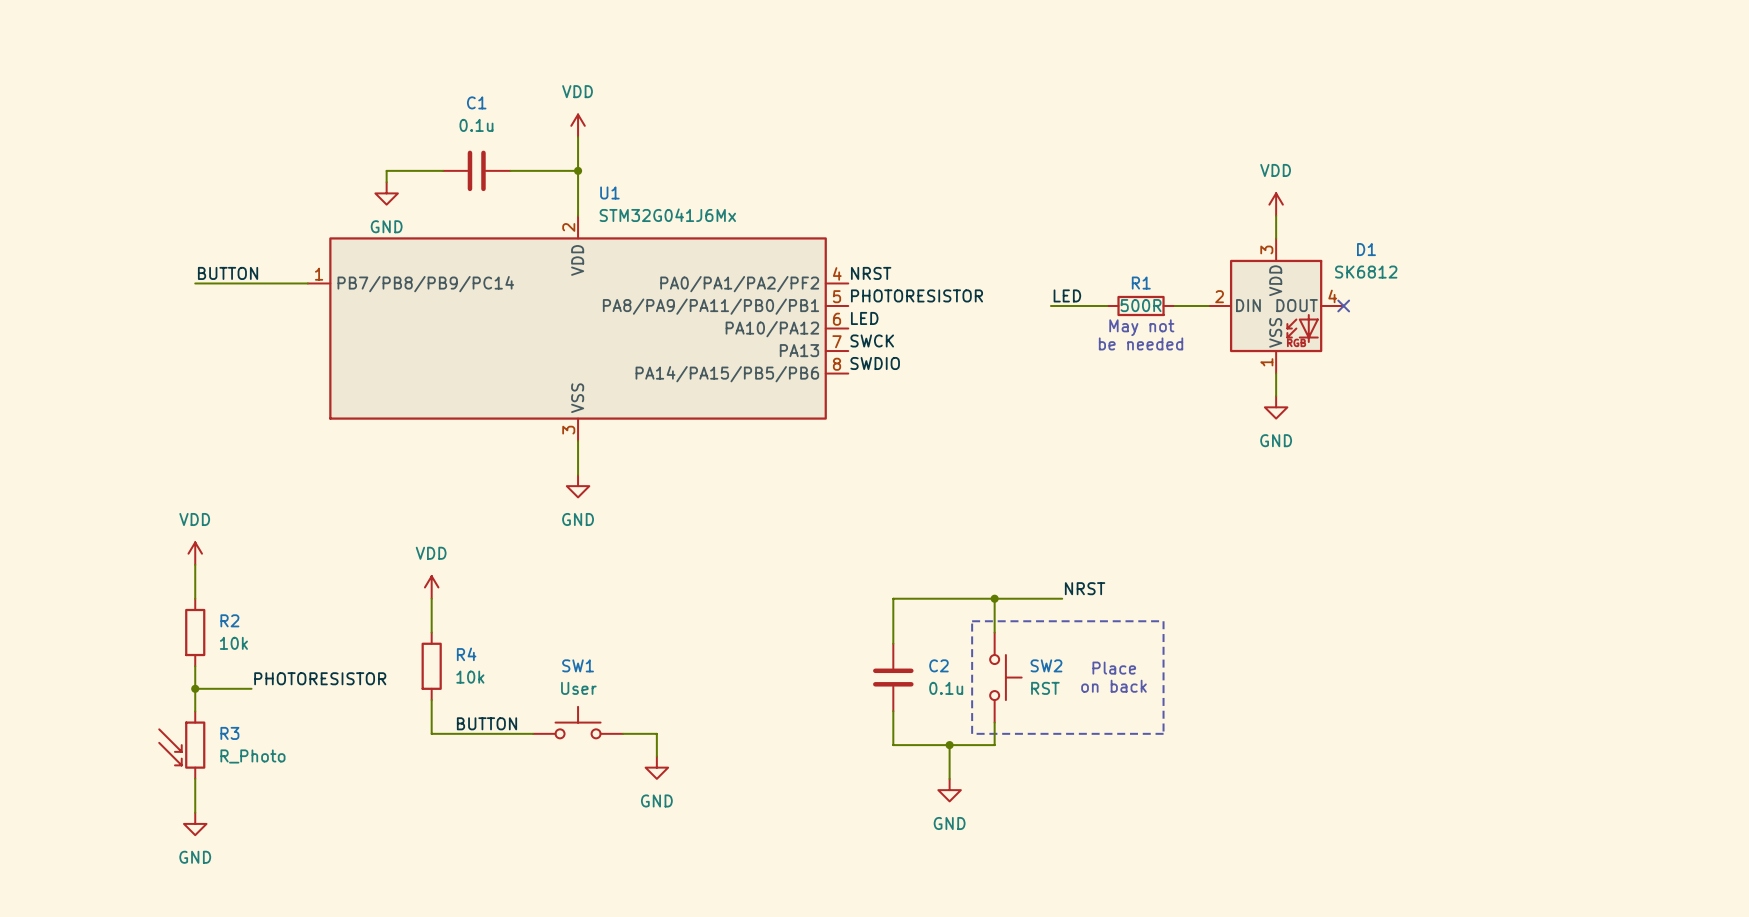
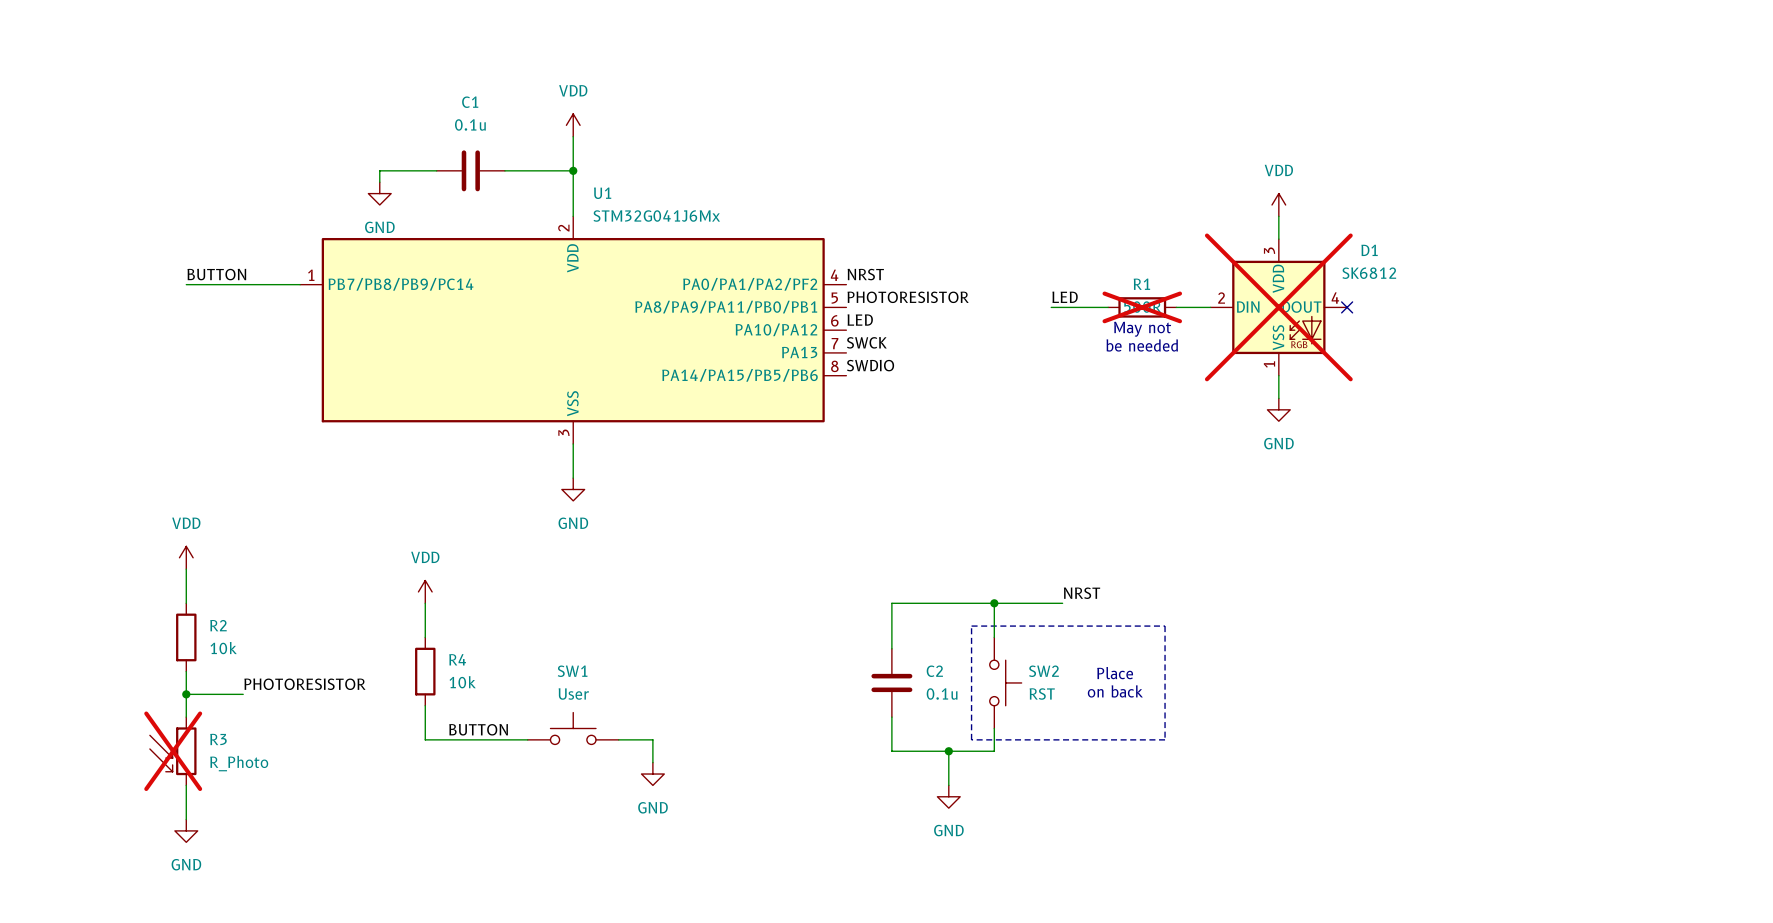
R1 do-not-place cross: none -> (1142, 307)
D1 do-not-place cross: none -> (1278, 307)
R3 do-not-place cross: none -> (173, 751)

